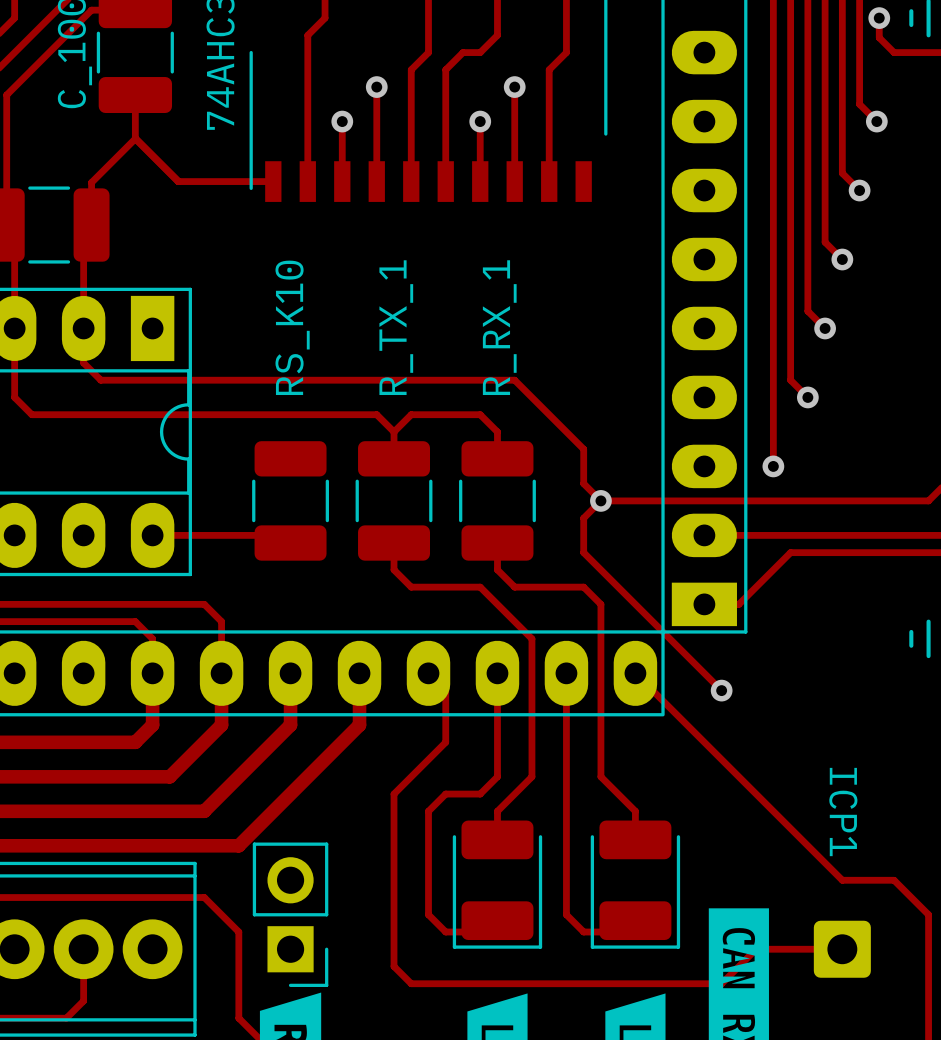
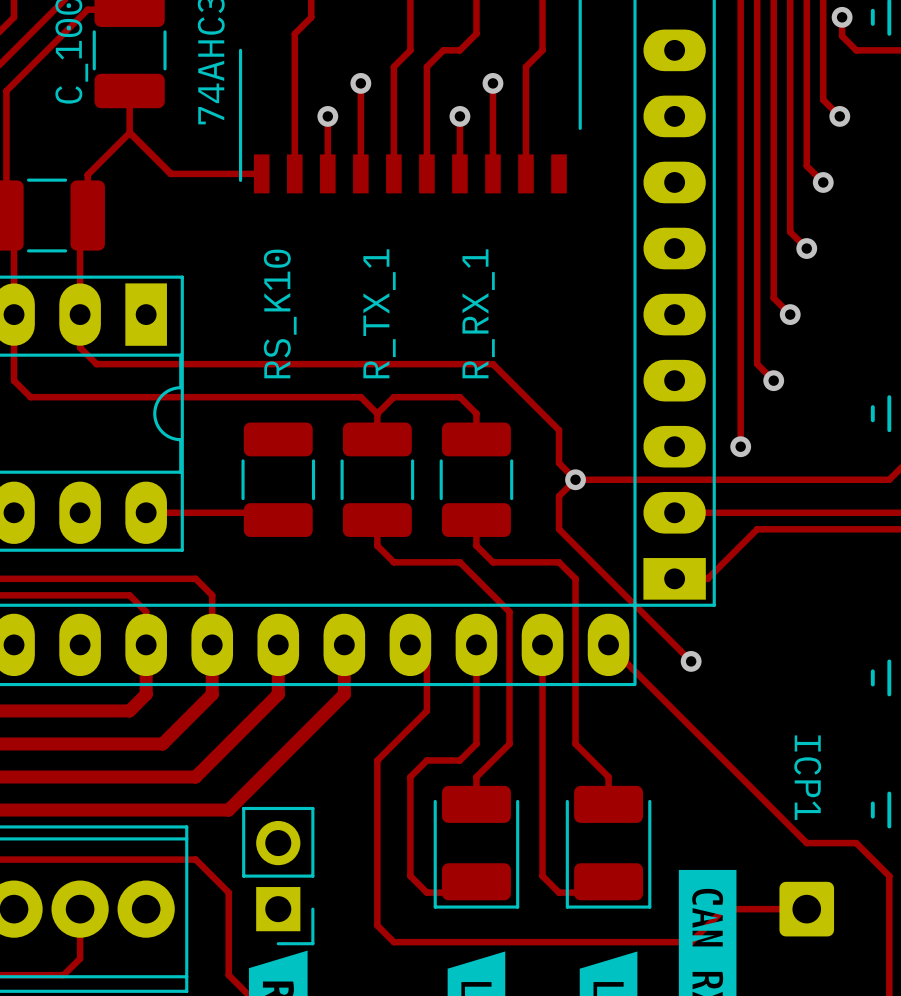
line: none -> (889, 397) (889, 430)
line: none -> (872, 407) (872, 420)
line: (928, 621) (928, 656) -> (889, 661) (889, 694)
line: (911, 631) (911, 645) -> (872, 671) (872, 684)
line: none -> (889, 793) (889, 826)
line: none -> (872, 803) (872, 816)

